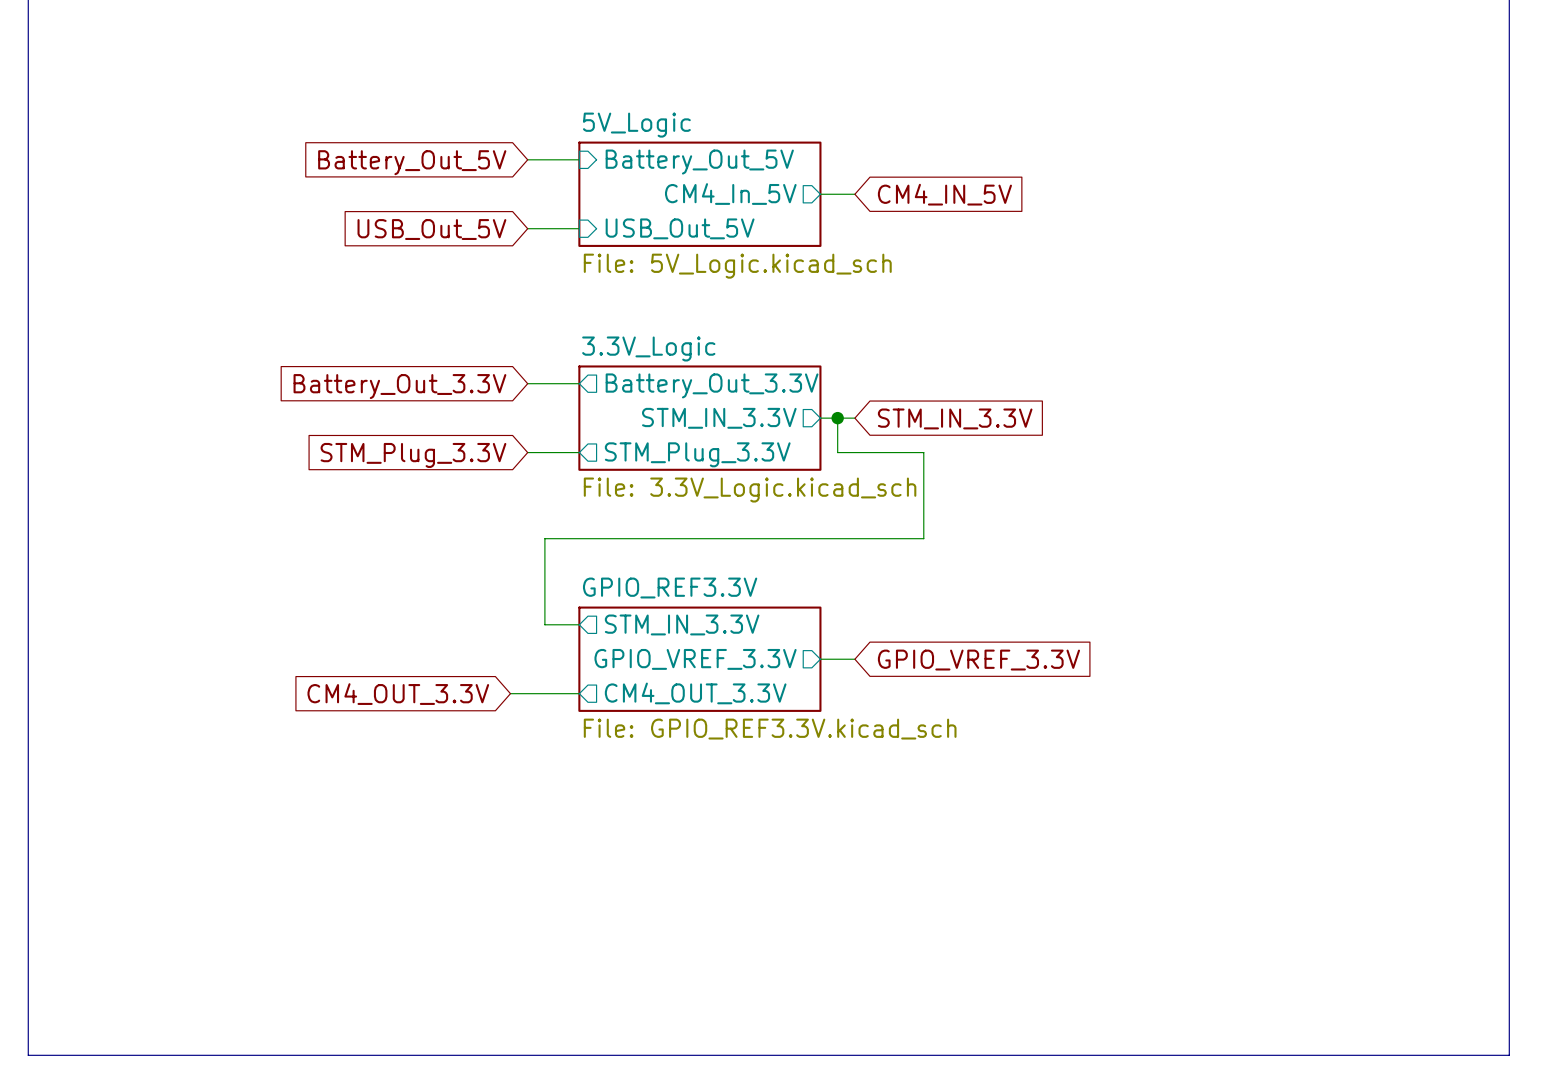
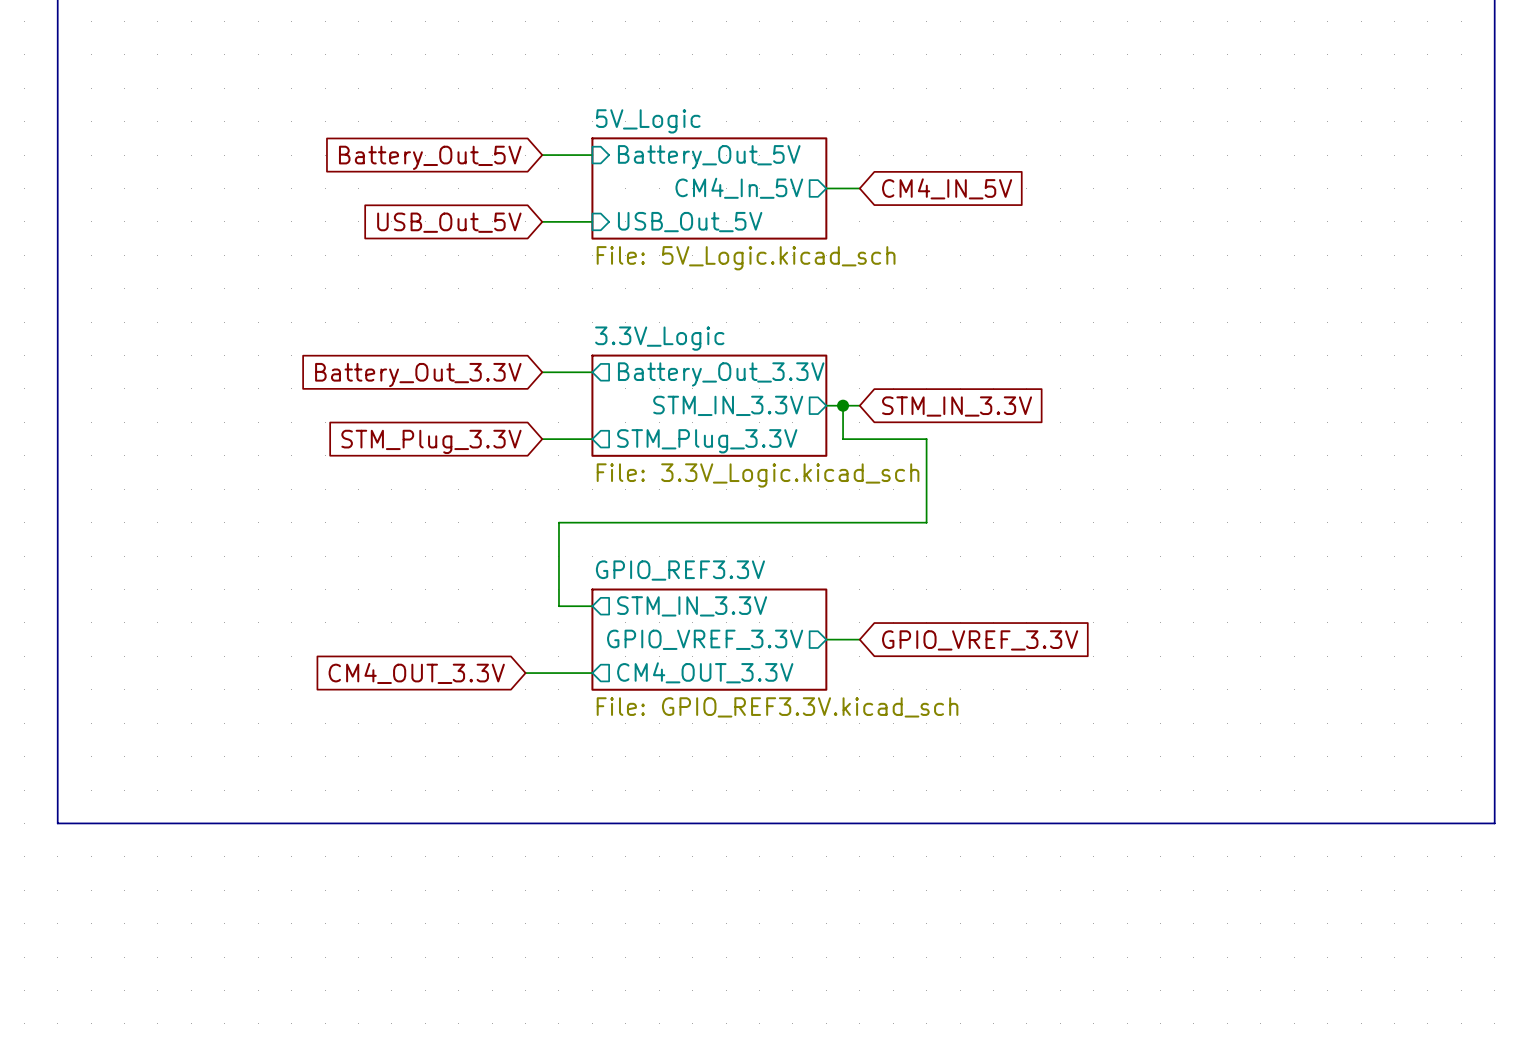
line: (28, 848) (28, 1055) (1509, 1055) (1509, 848) -> (57, 823) (1494, 823)

